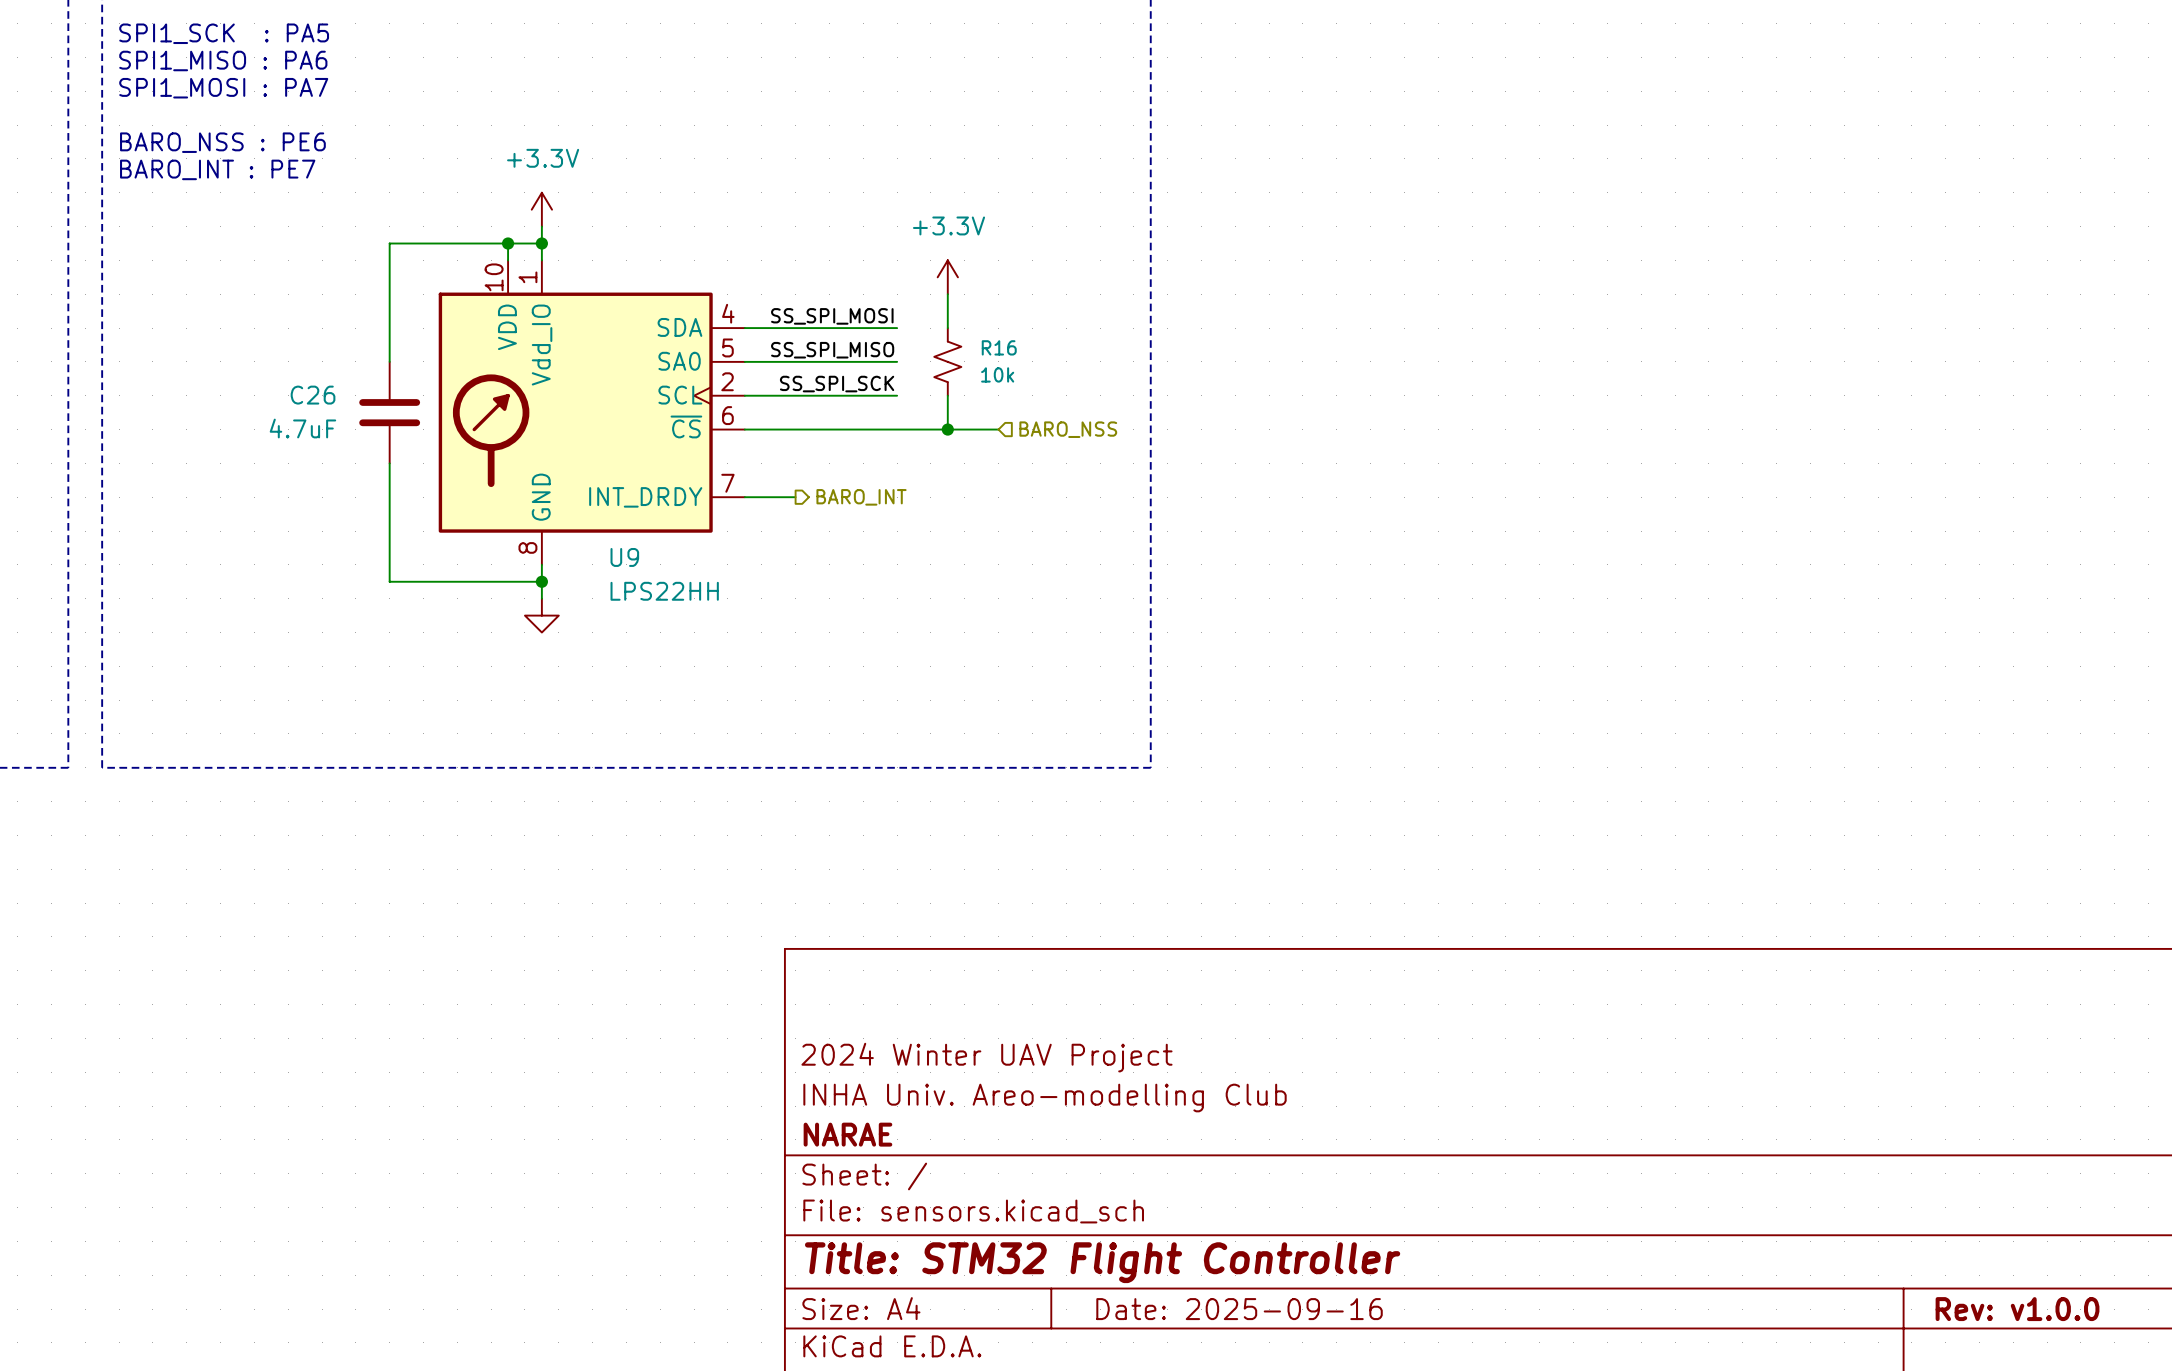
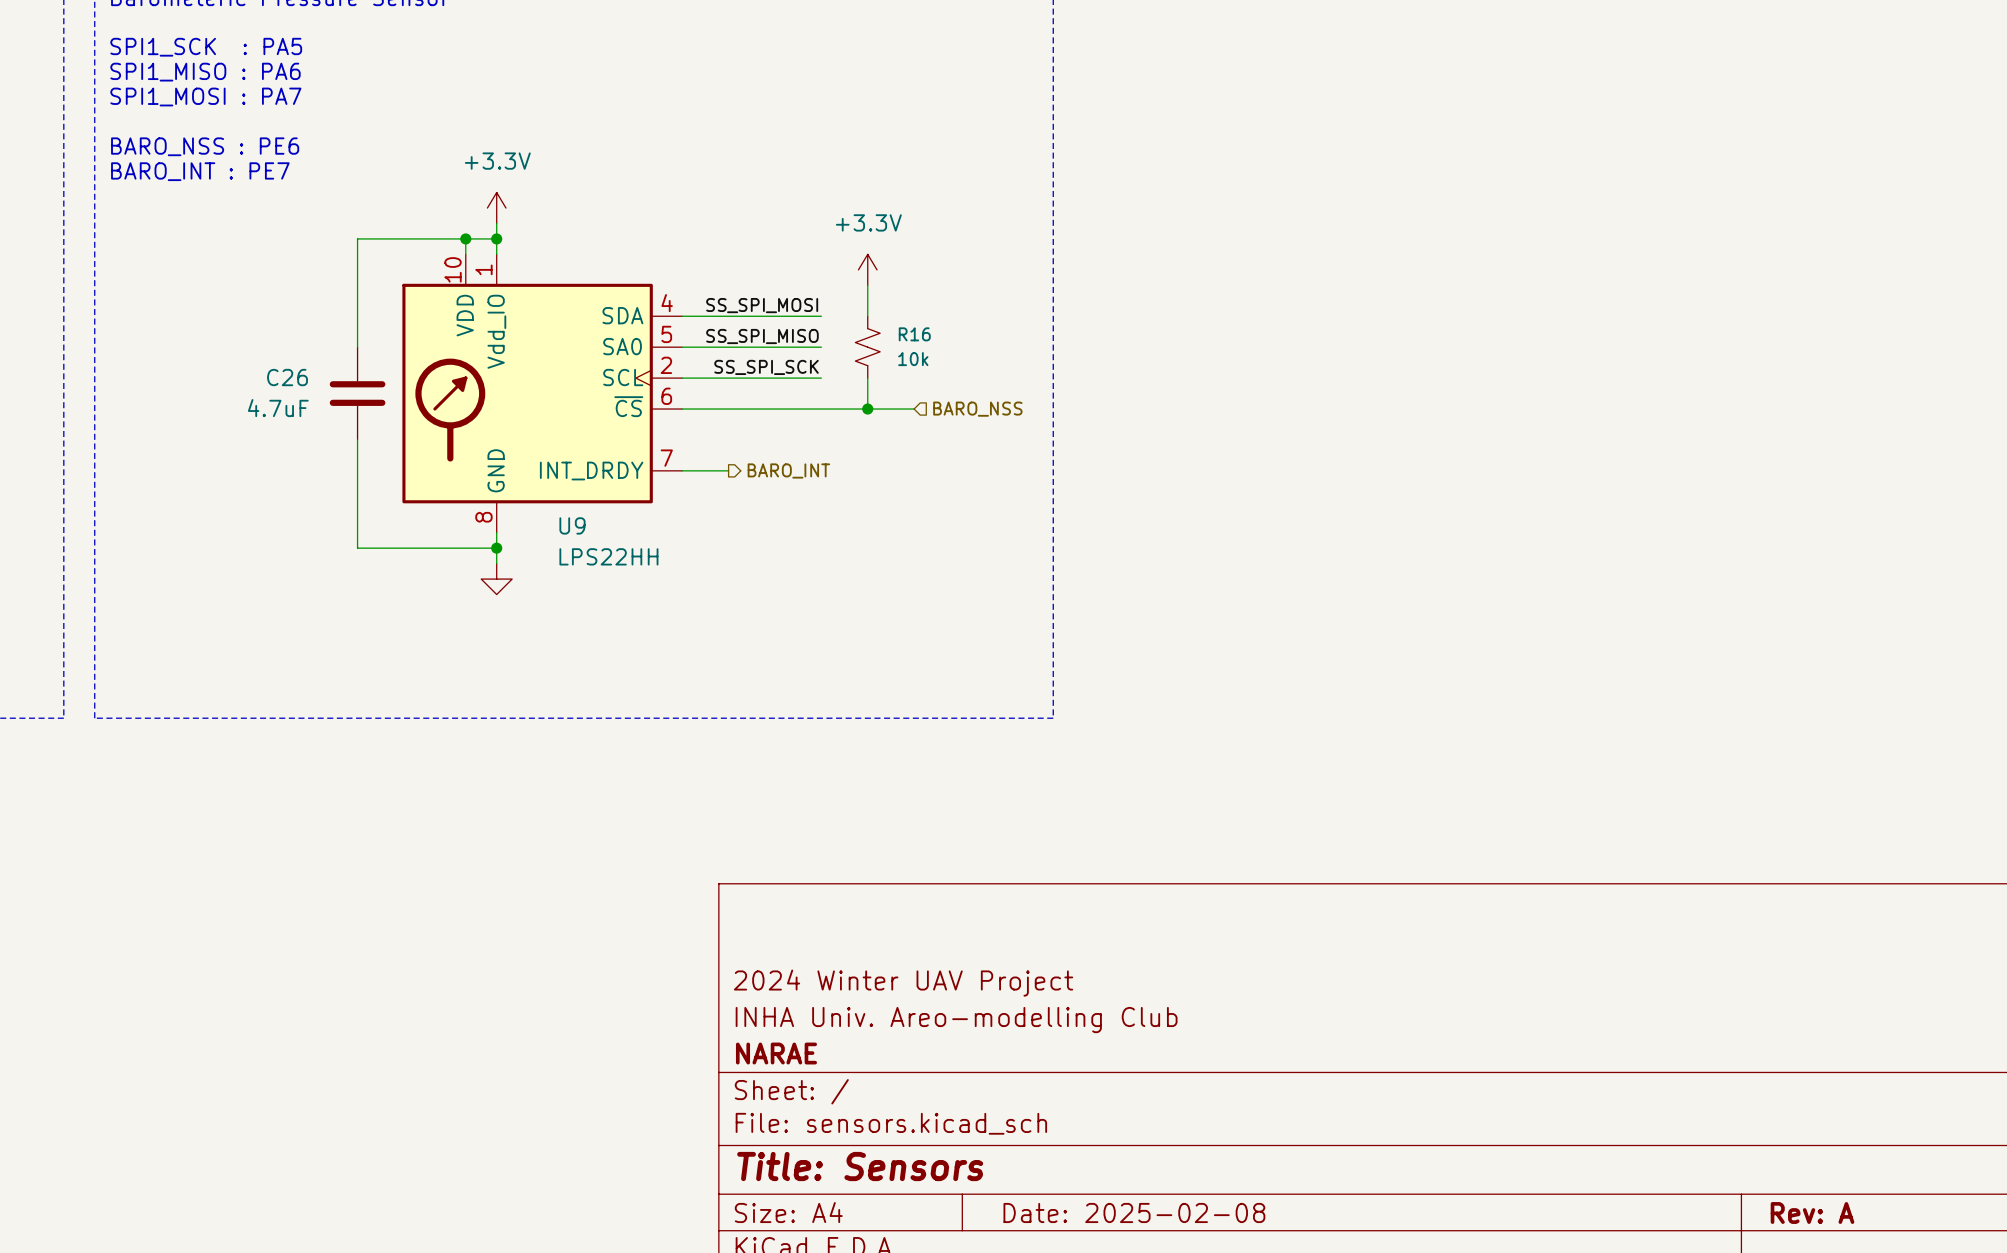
title block: Title: STM32 Flight Controller (1102, 1262) -> Title: Sensors (860, 1166)
title block: Date: 2025-09-16 (1239, 1309) -> Date: 2025-02-08 (1134, 1212)
title block: Rev: v1.0.0 (2017, 1309) -> Rev: A (1812, 1212)

